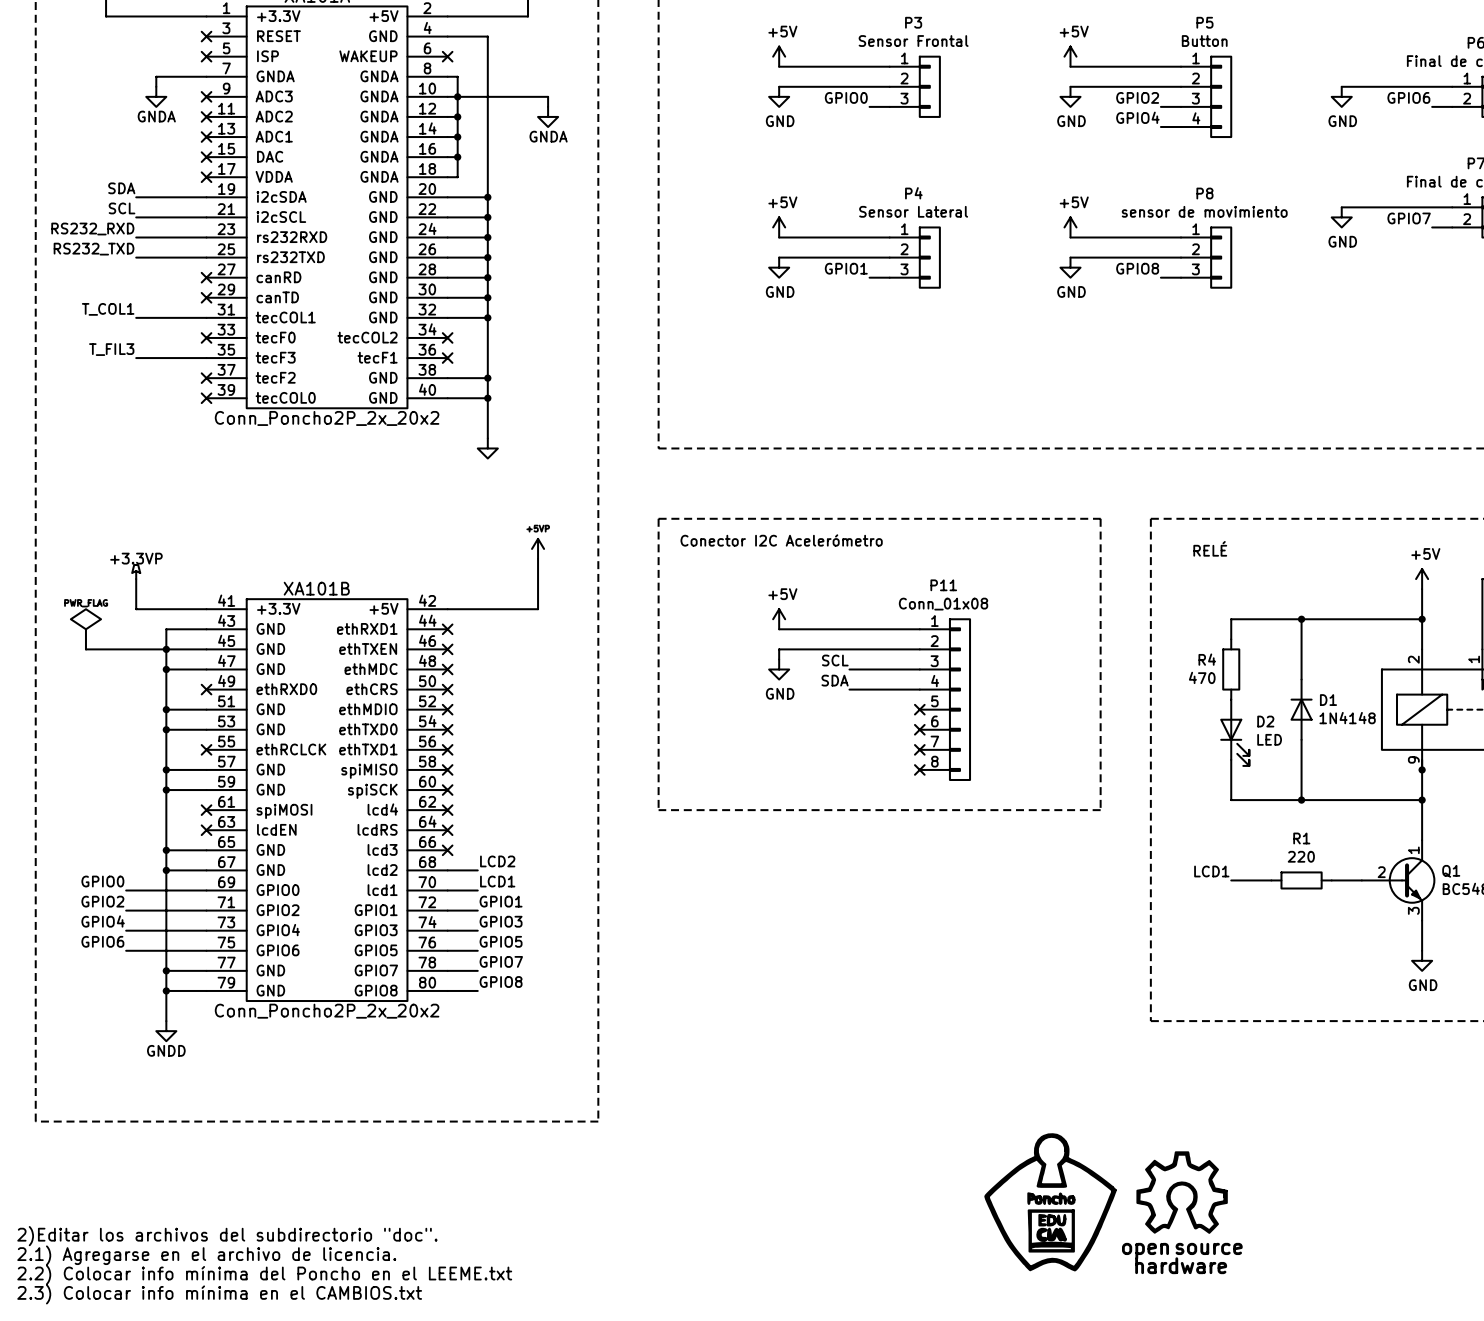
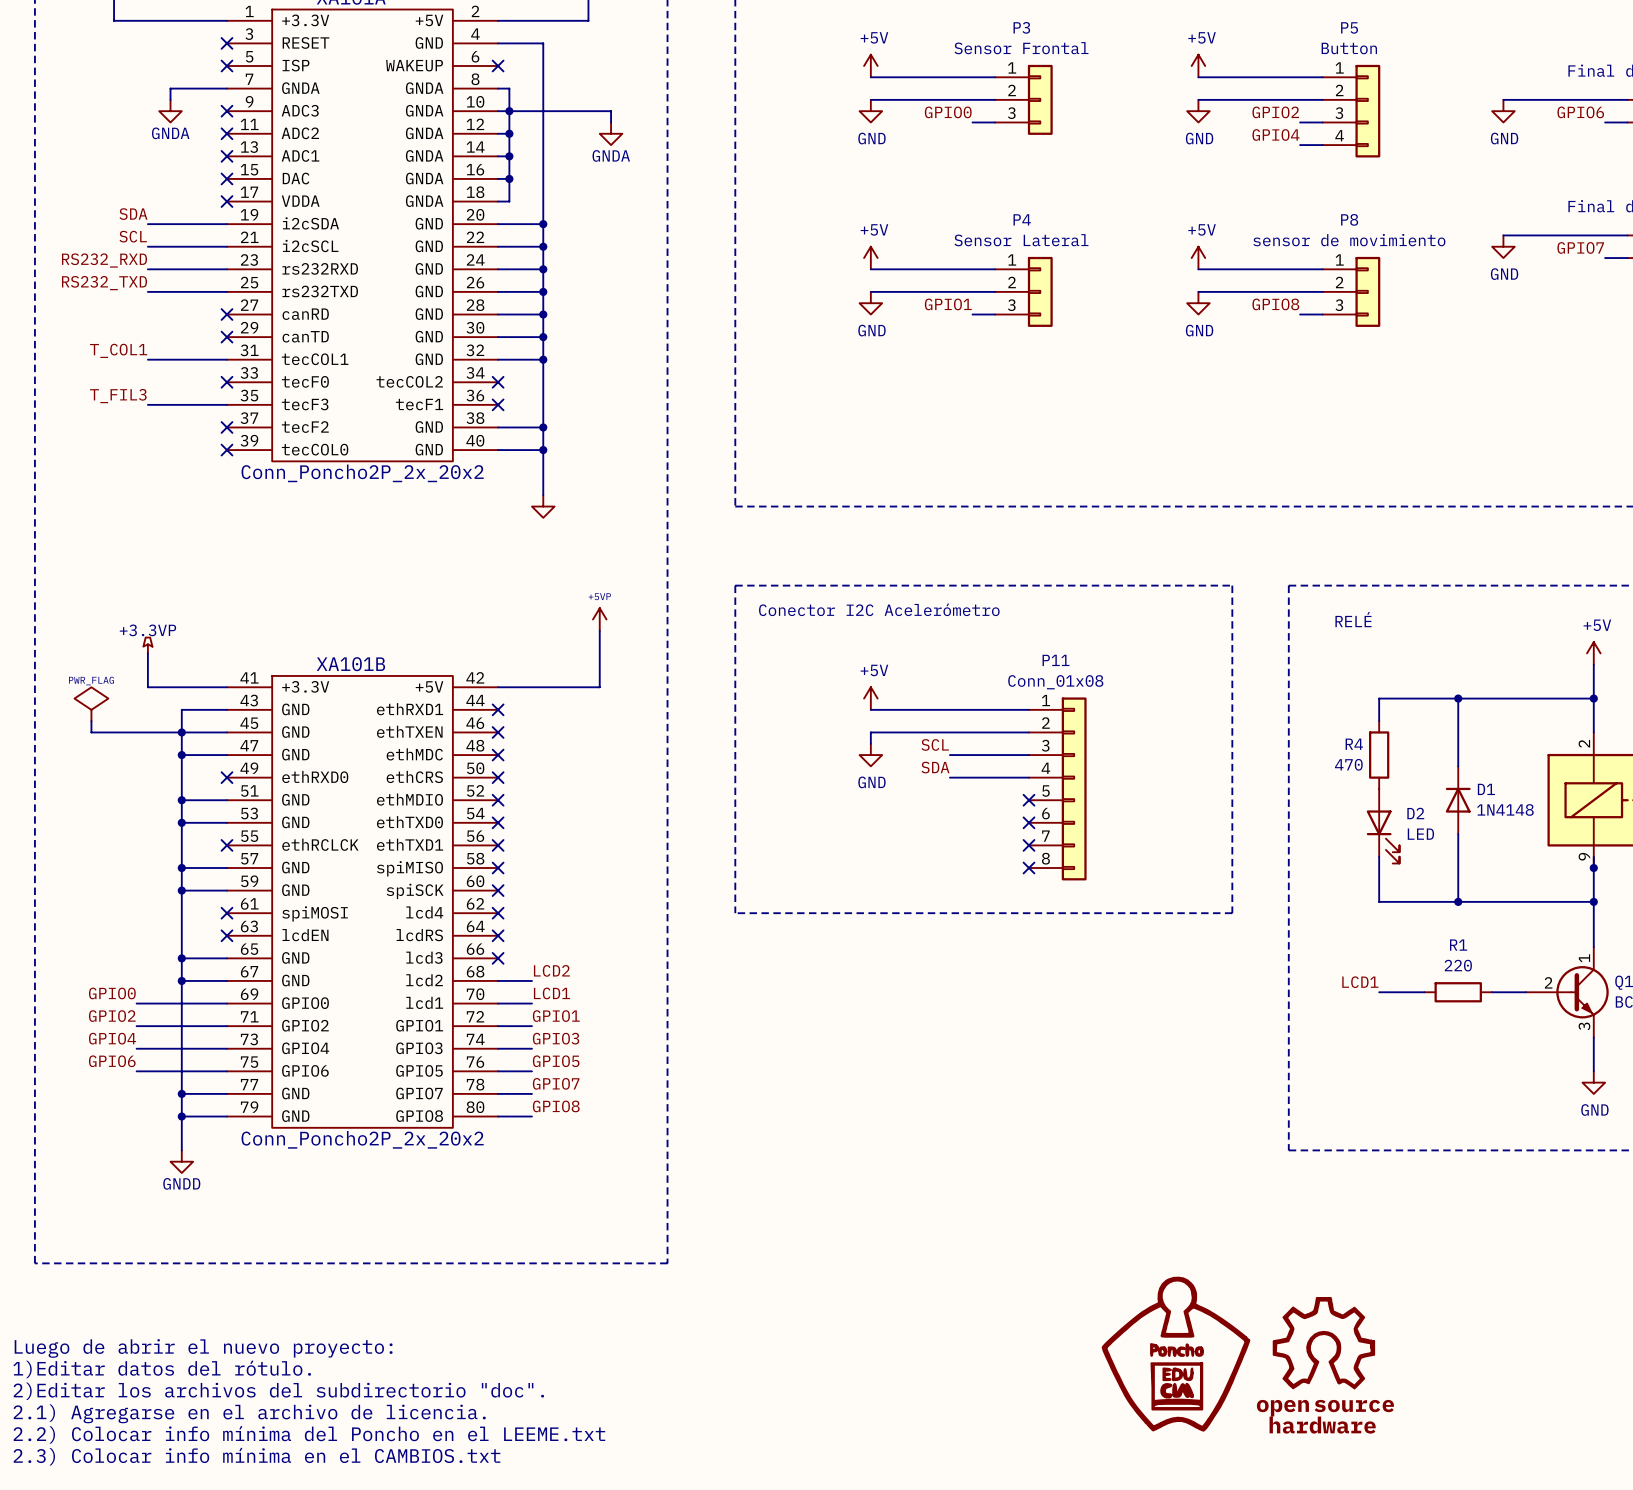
text: none -> Luego de abrir el nuevo proyecto: (203, 1348)
text: none -> 1)Editar datos del rótulo. (162, 1369)

